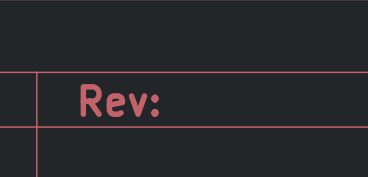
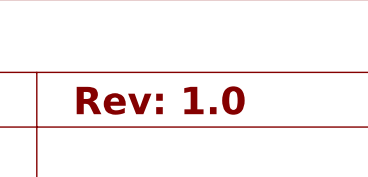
title block: Rev: (119, 100) -> Rev: 1.0 (160, 100)

